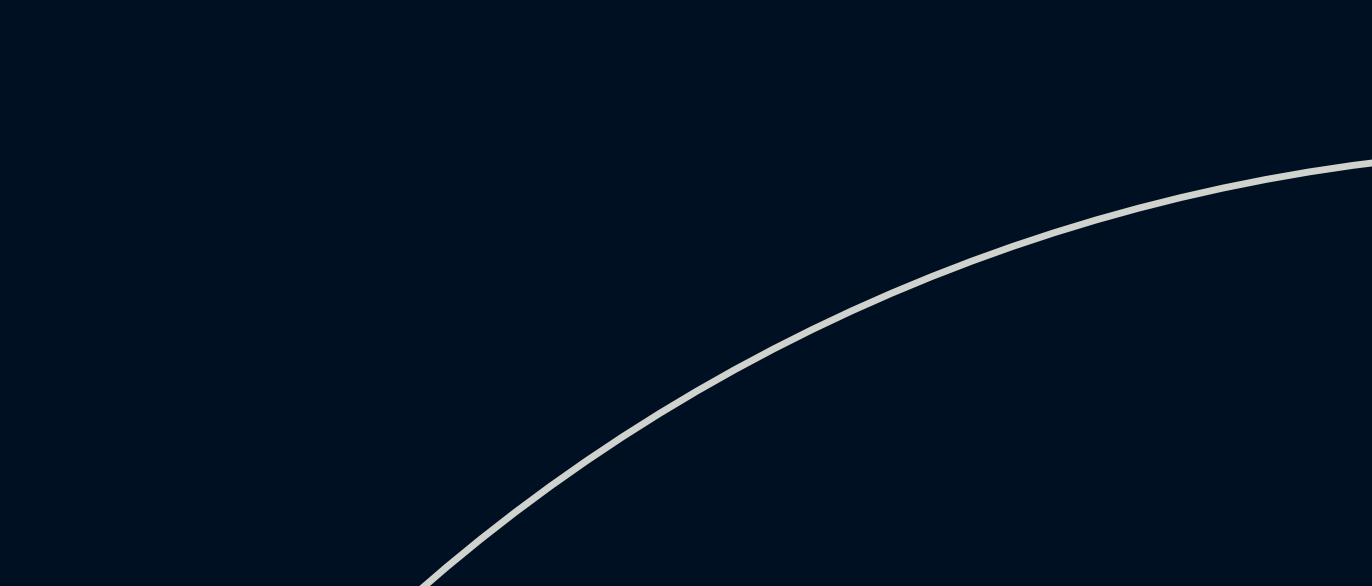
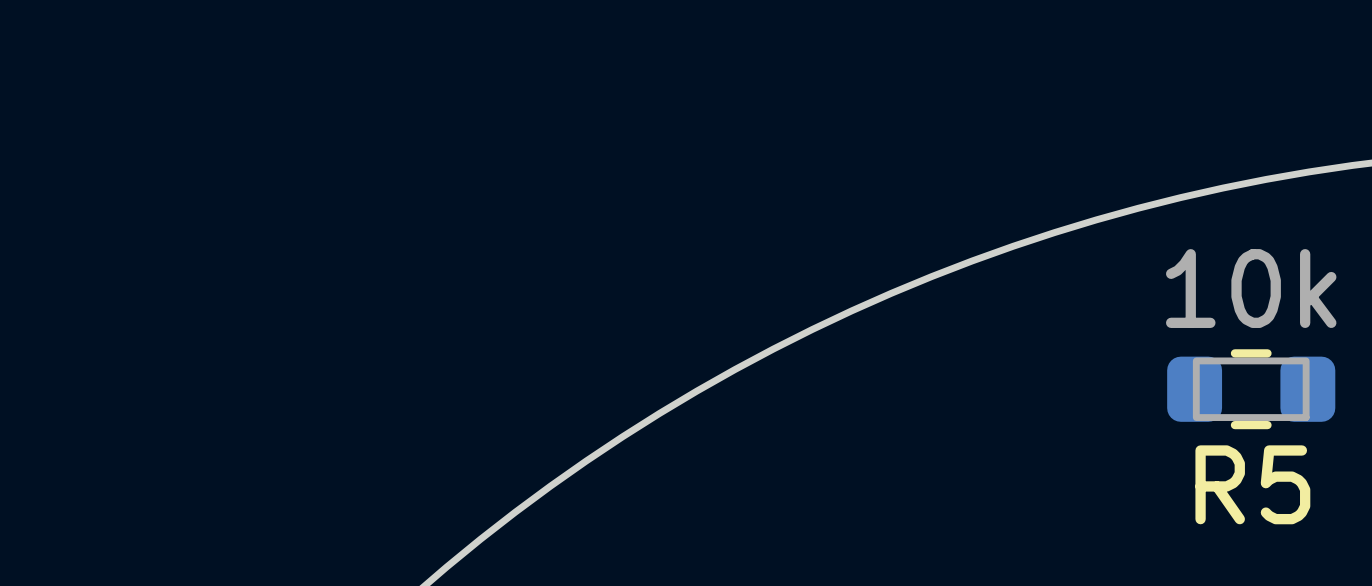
R5: none -> 10k (1251, 389)

